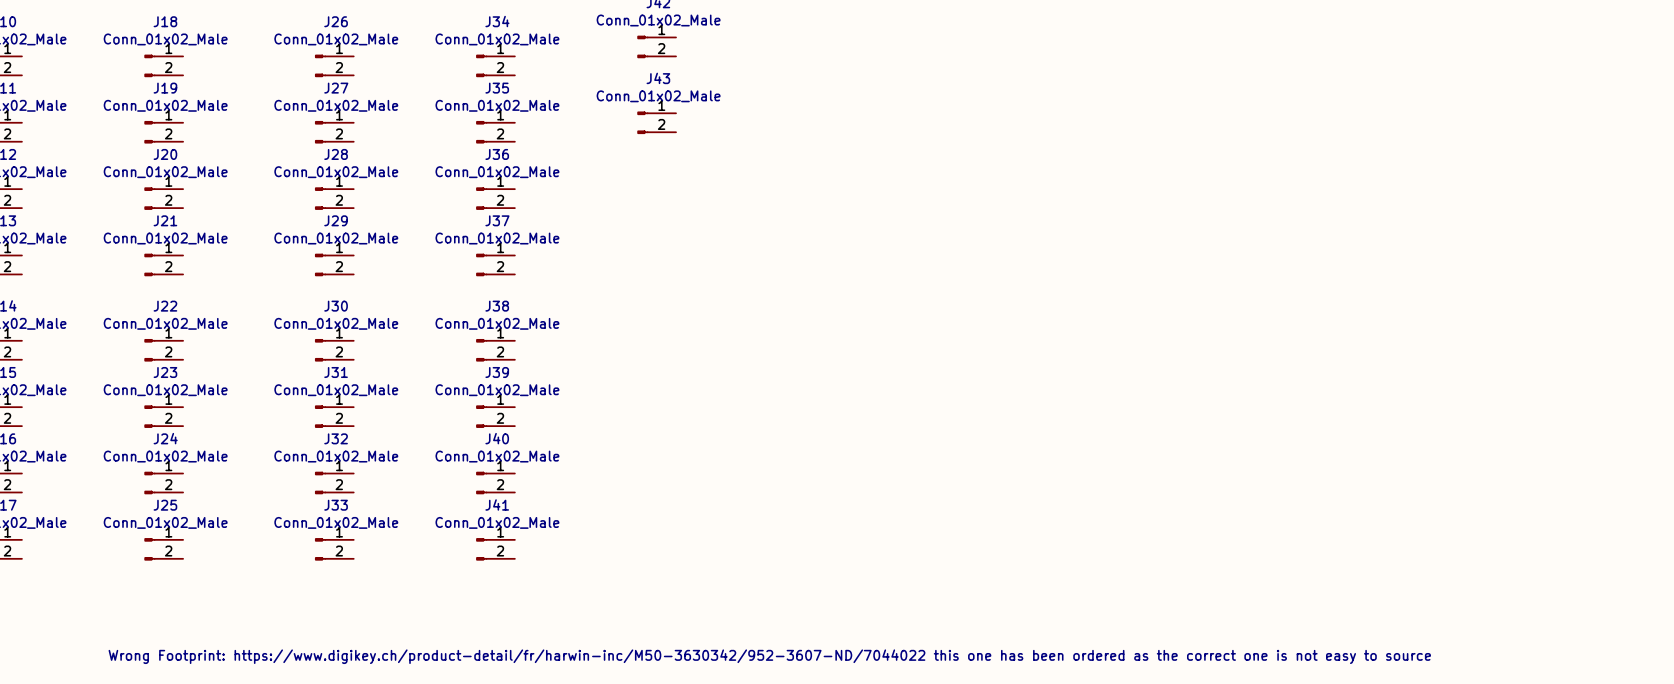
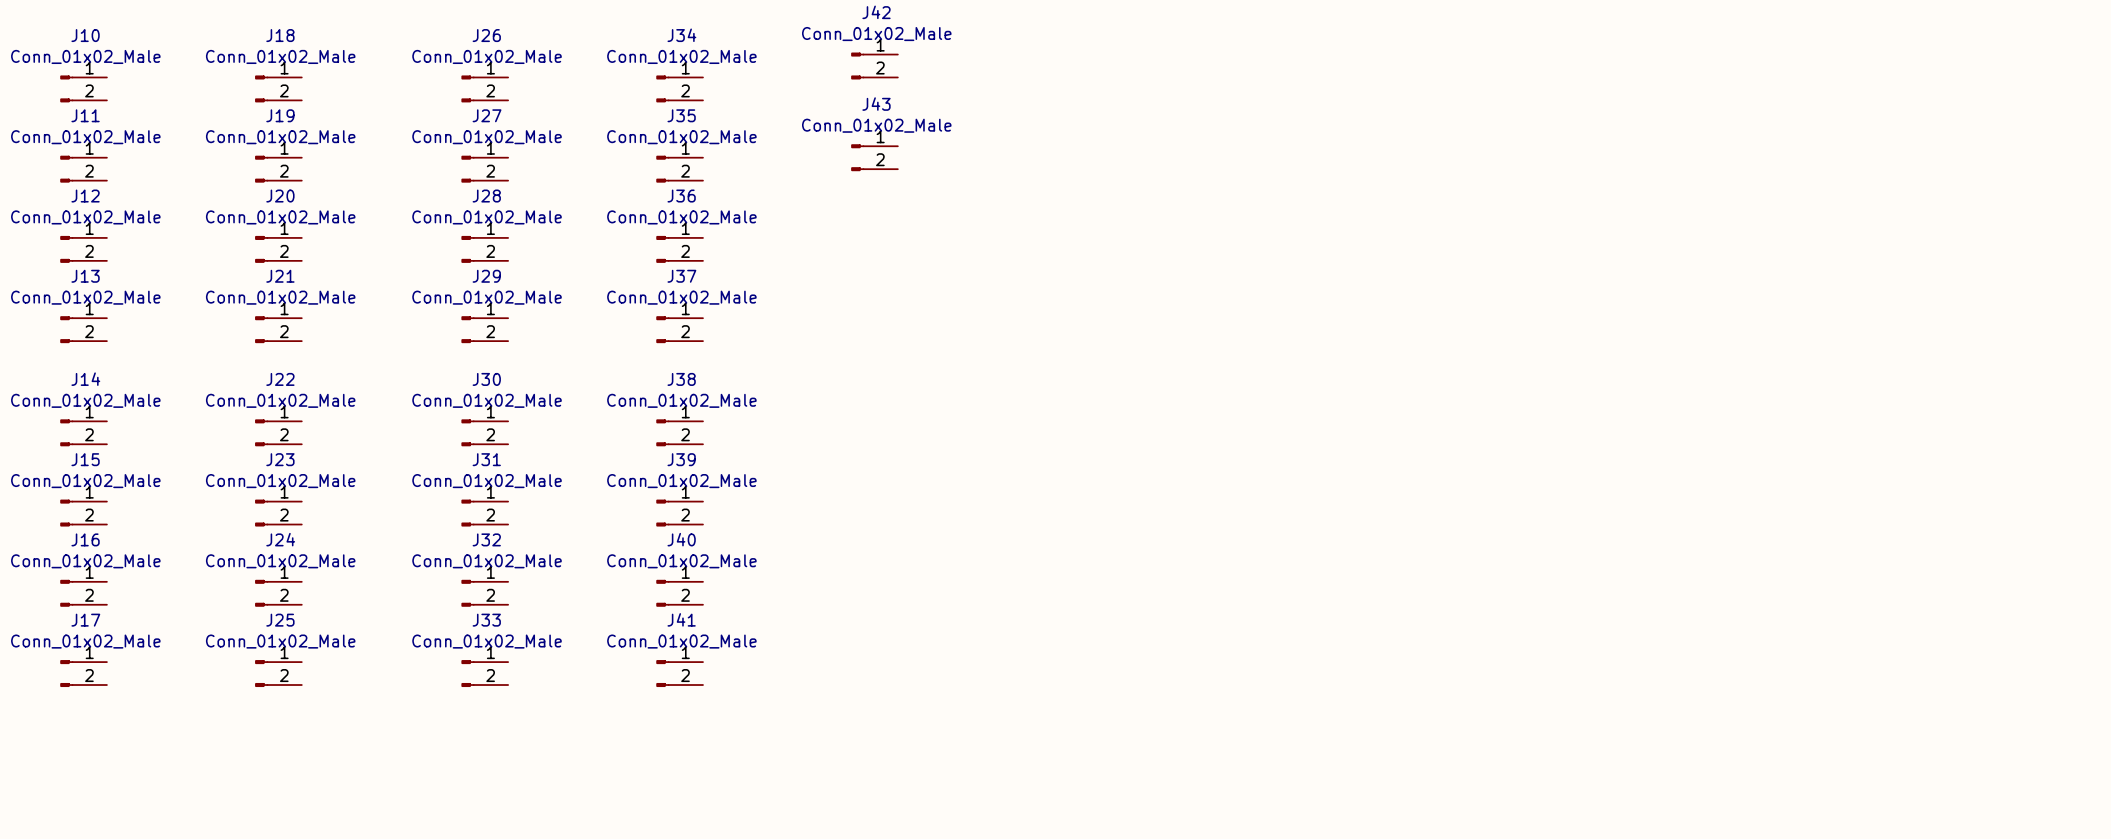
text: Wrong Footprint: https://www.digikey.ch/product-detail/fr/harwin-inc/M50-3630342/952-3607-ND/7044022 this one has been ordered as the correct one is not easy to source (769, 656) -> none

